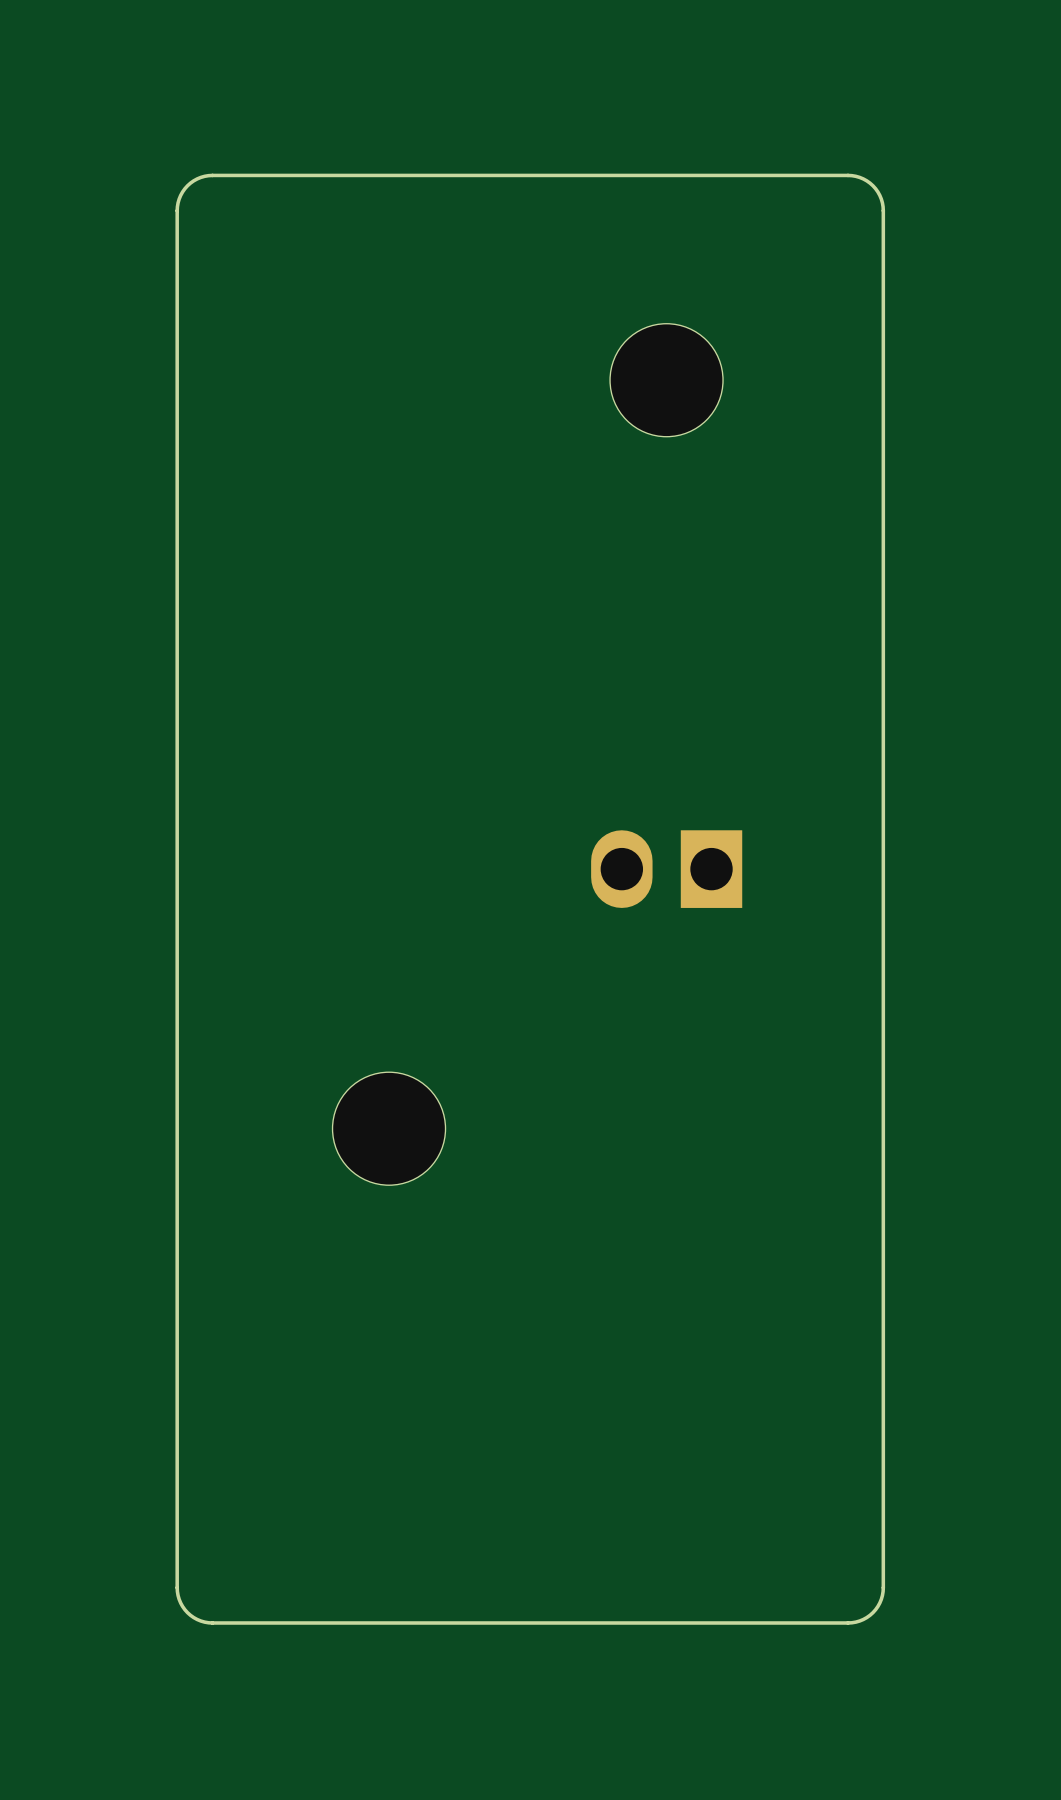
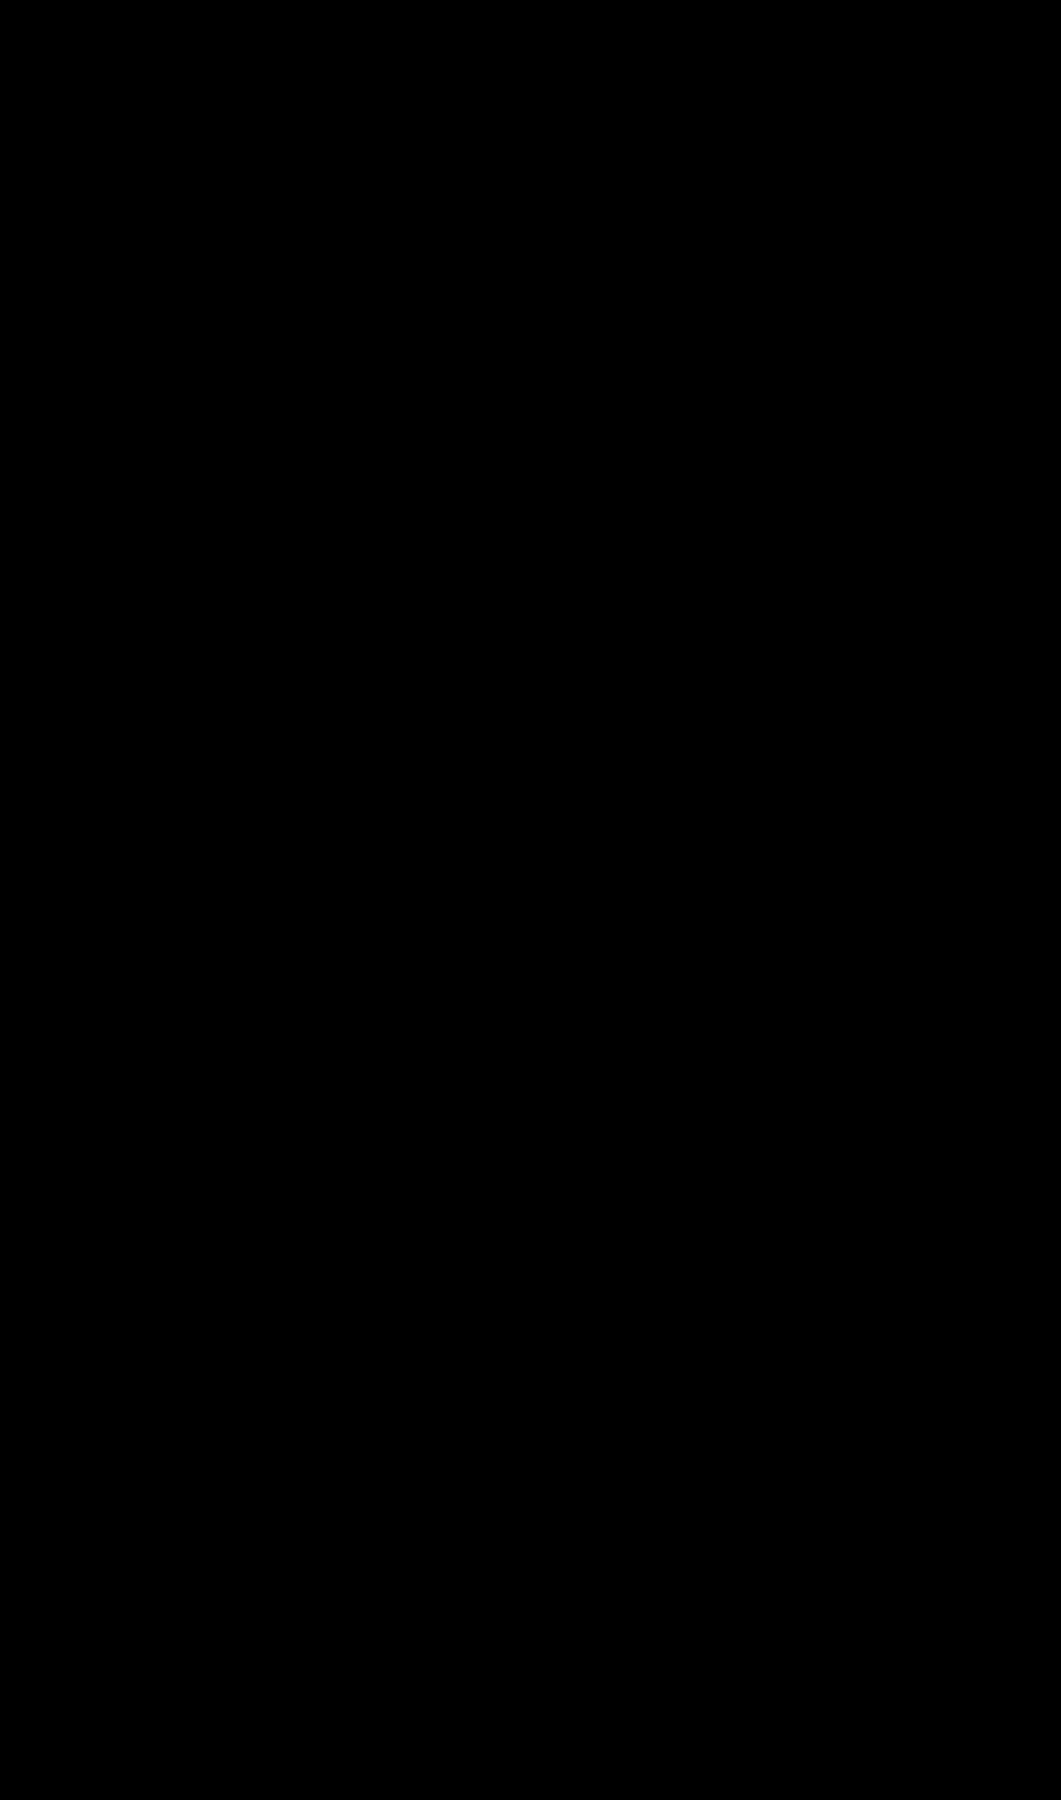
board edge: (848, 175) (212, 175) (193, 180) (180, 195) (177, 210) (177, 1587) (182, 1606) (197, 1619) (212, 1622) (848, 1622) (866, 1617) (879, 1603) (883, 1587) (883, 210) (881, 199) (872, 185) (859, 177) (848, 175) -> none
part: (666, 380) -> none
part: (666, 869) -> none
part: (389, 1128) -> none

